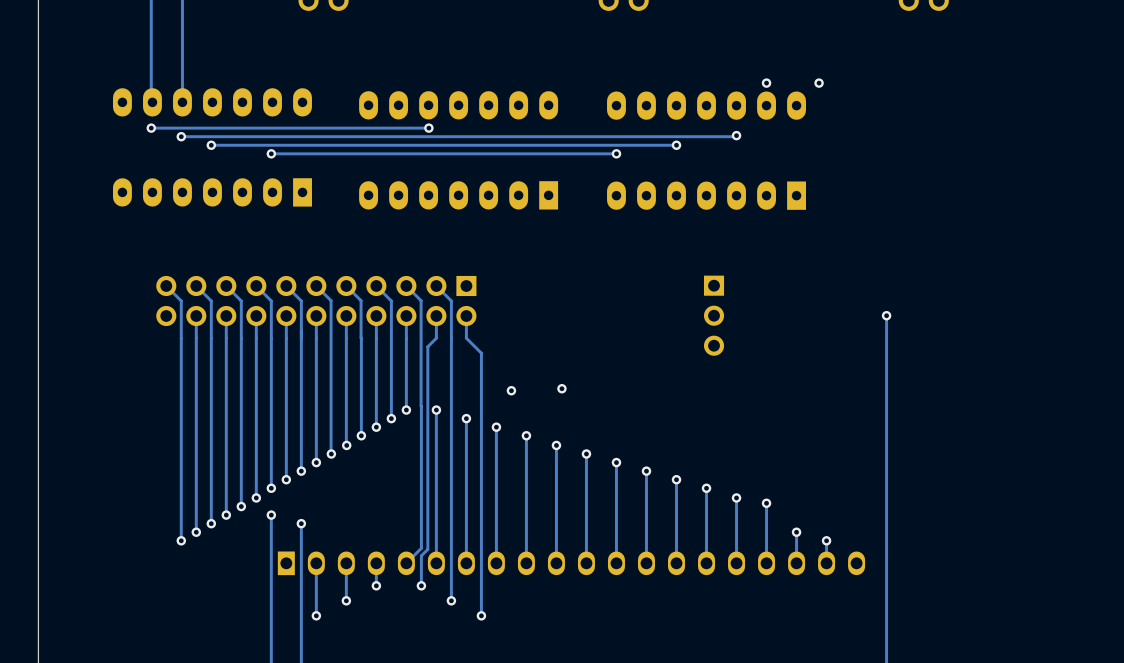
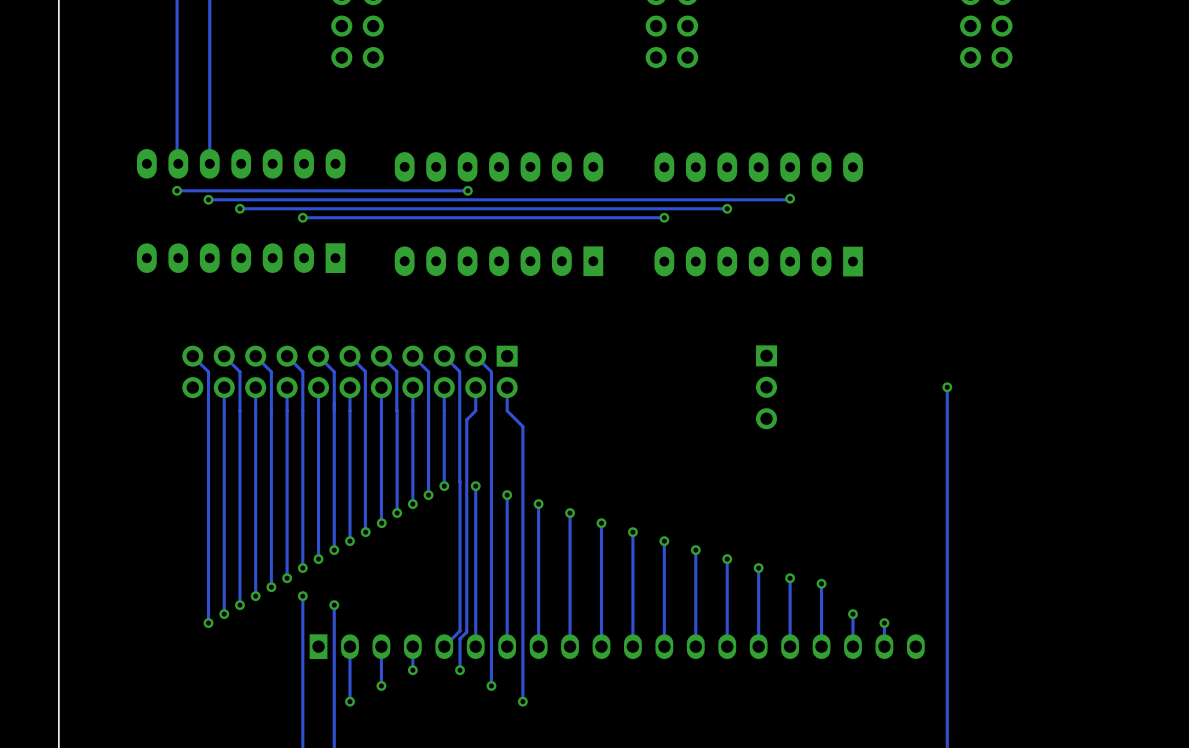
via: (766, 83) -> none
via: (819, 83) -> none
via: (561, 388) -> none
via: (511, 390) -> none

